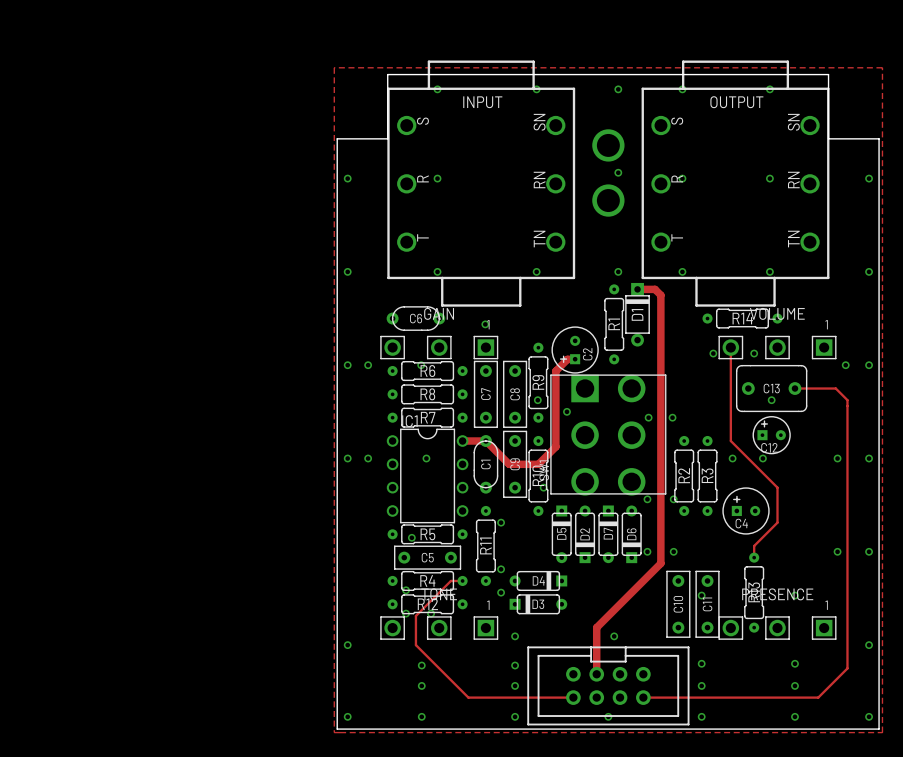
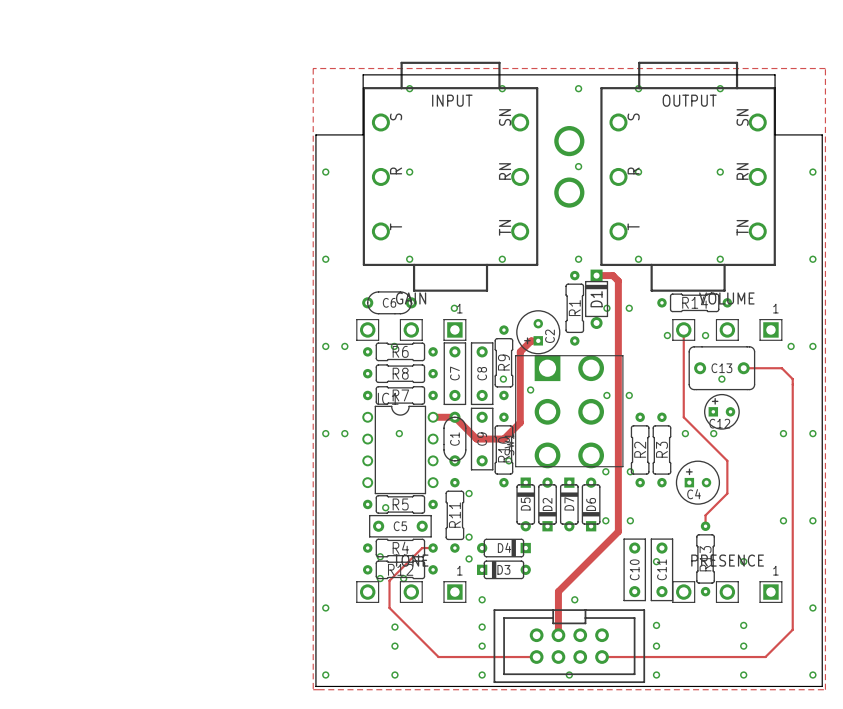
via: none -> (606, 308)
via: none -> (629, 308)

